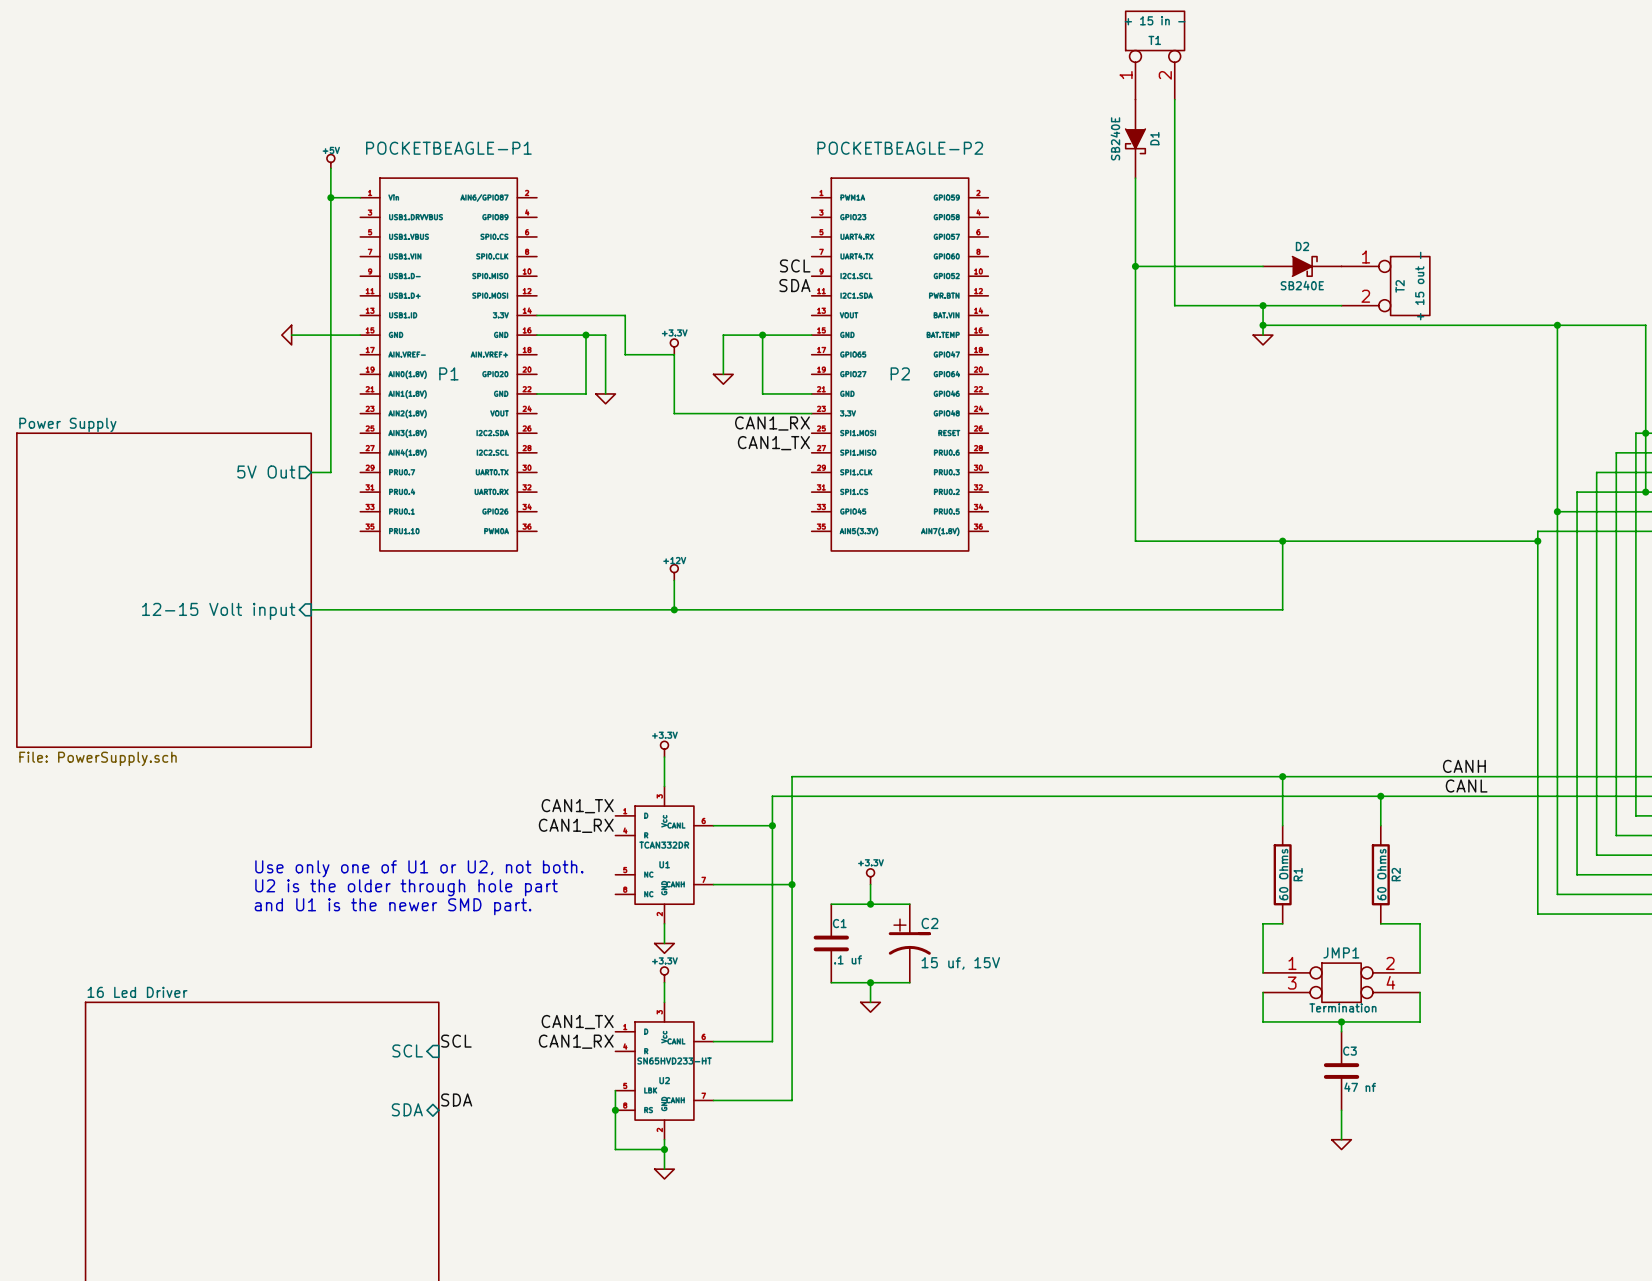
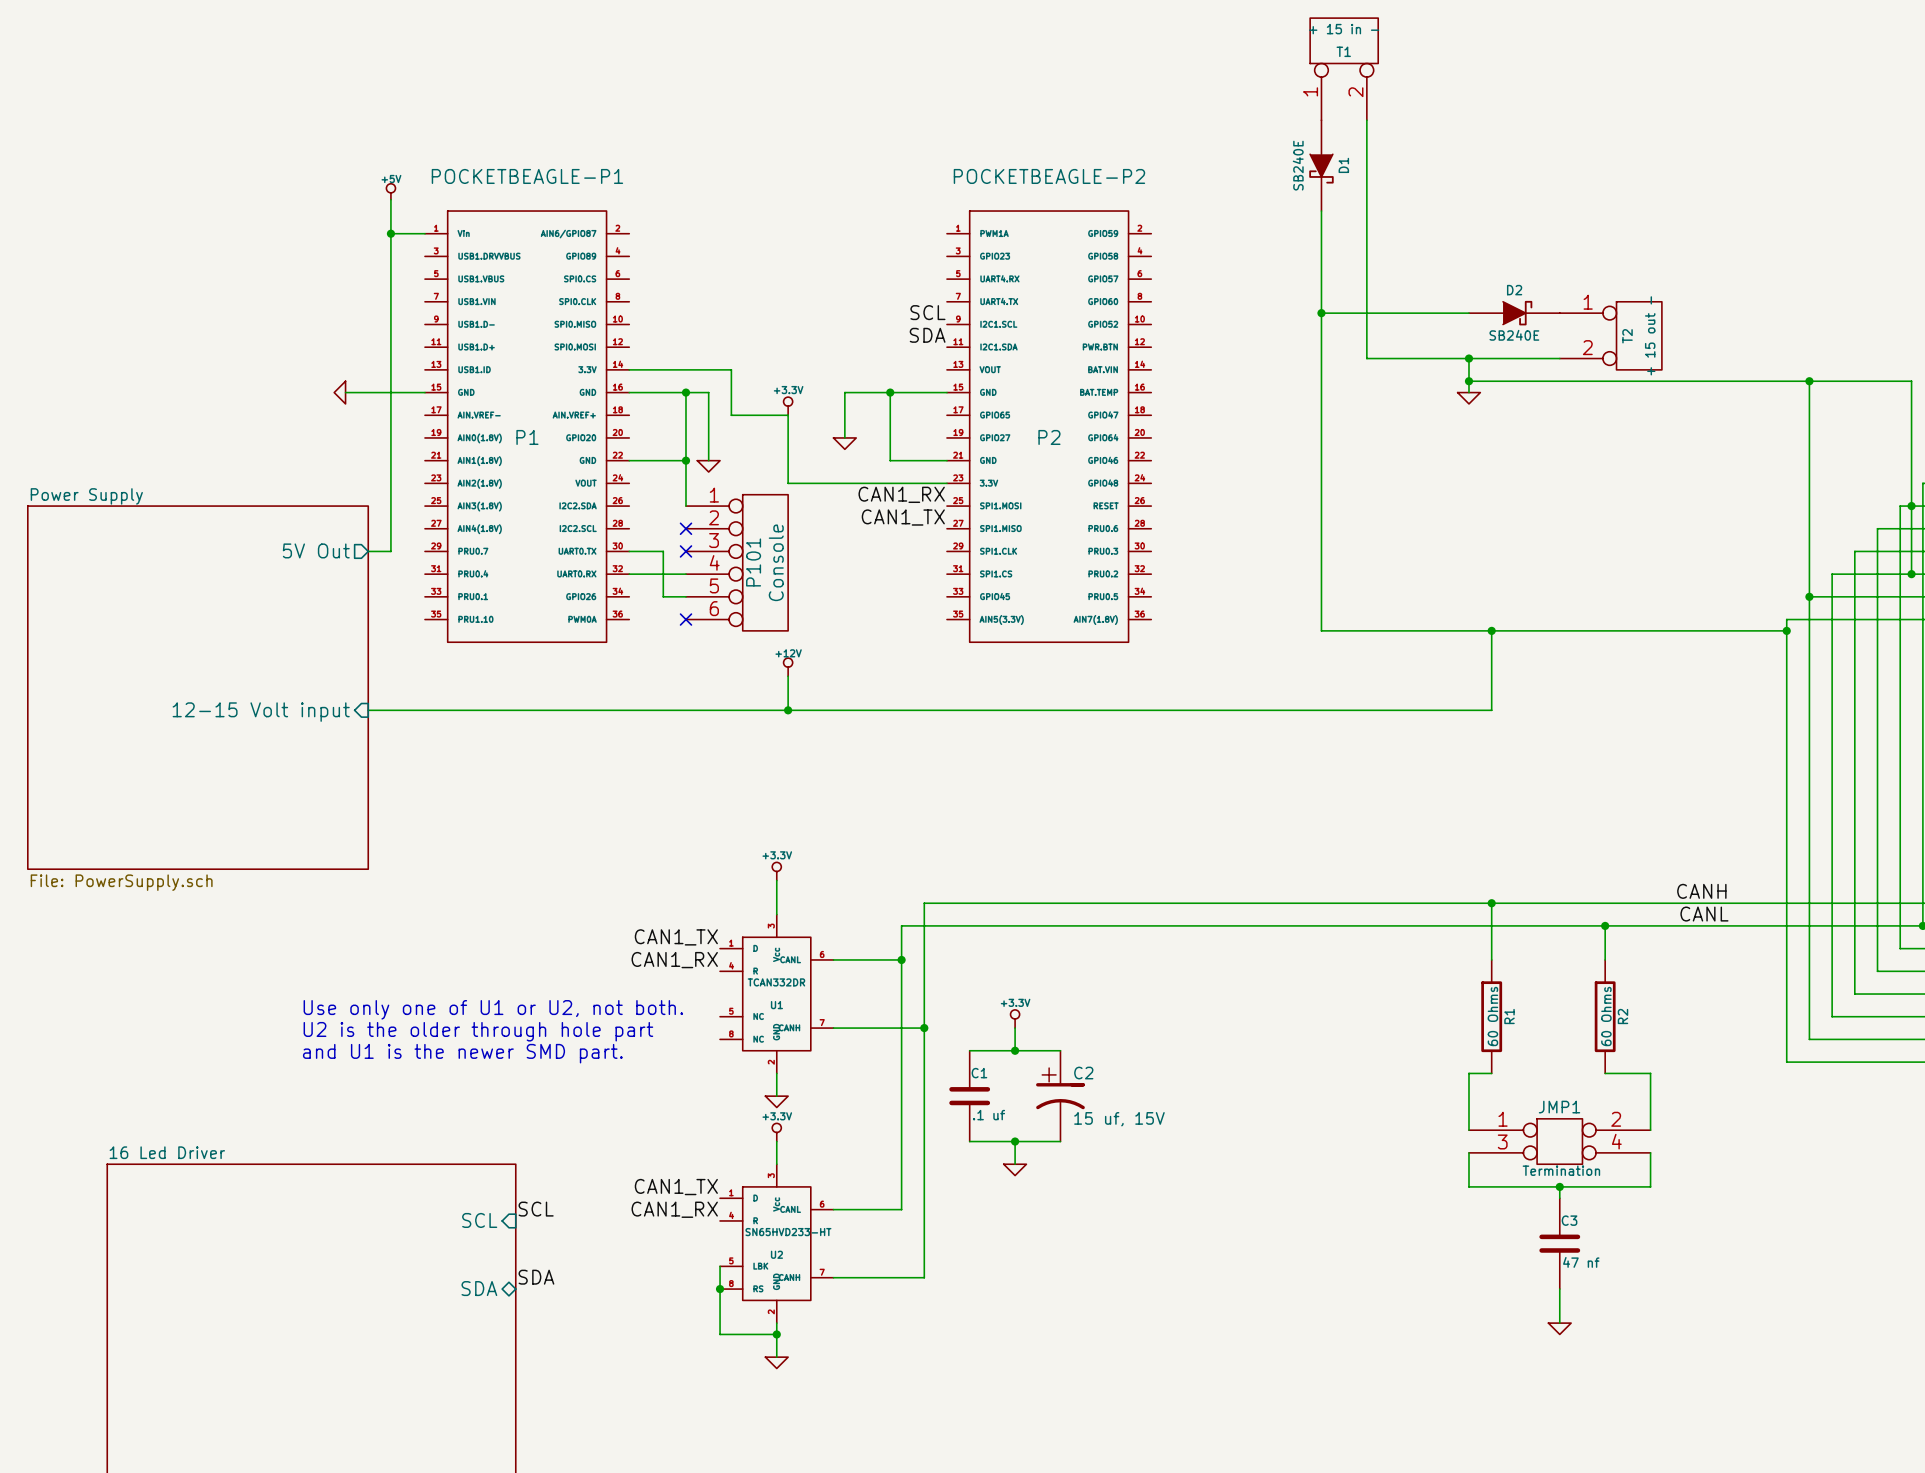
wire: none -> (685, 460) (685, 506)
junction: none -> (685, 460)
no-connect mark: none -> (685, 528)
wire: none -> (629, 551) (663, 551) (663, 596) (685, 596)
no-connect mark: none -> (685, 551)
P101: none -> Console (737, 562)
wire: none -> (629, 574) (685, 574)
no-connect mark: none -> (685, 619)

